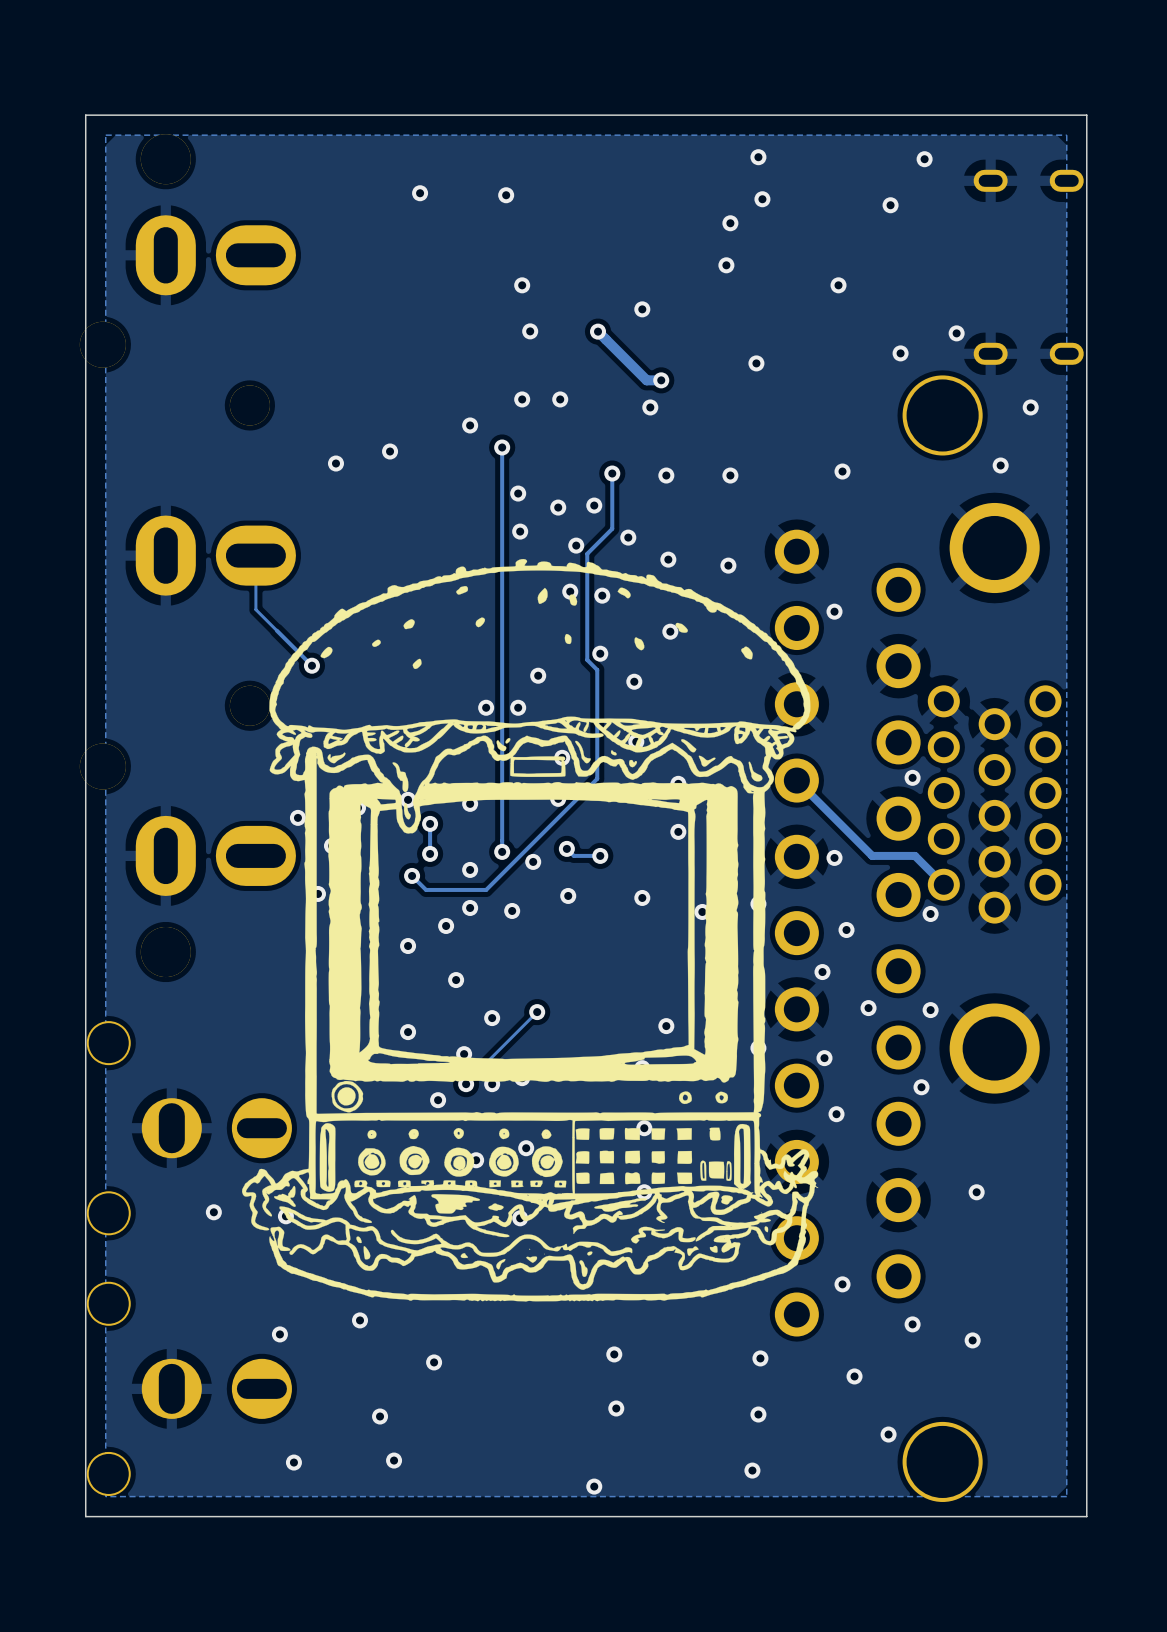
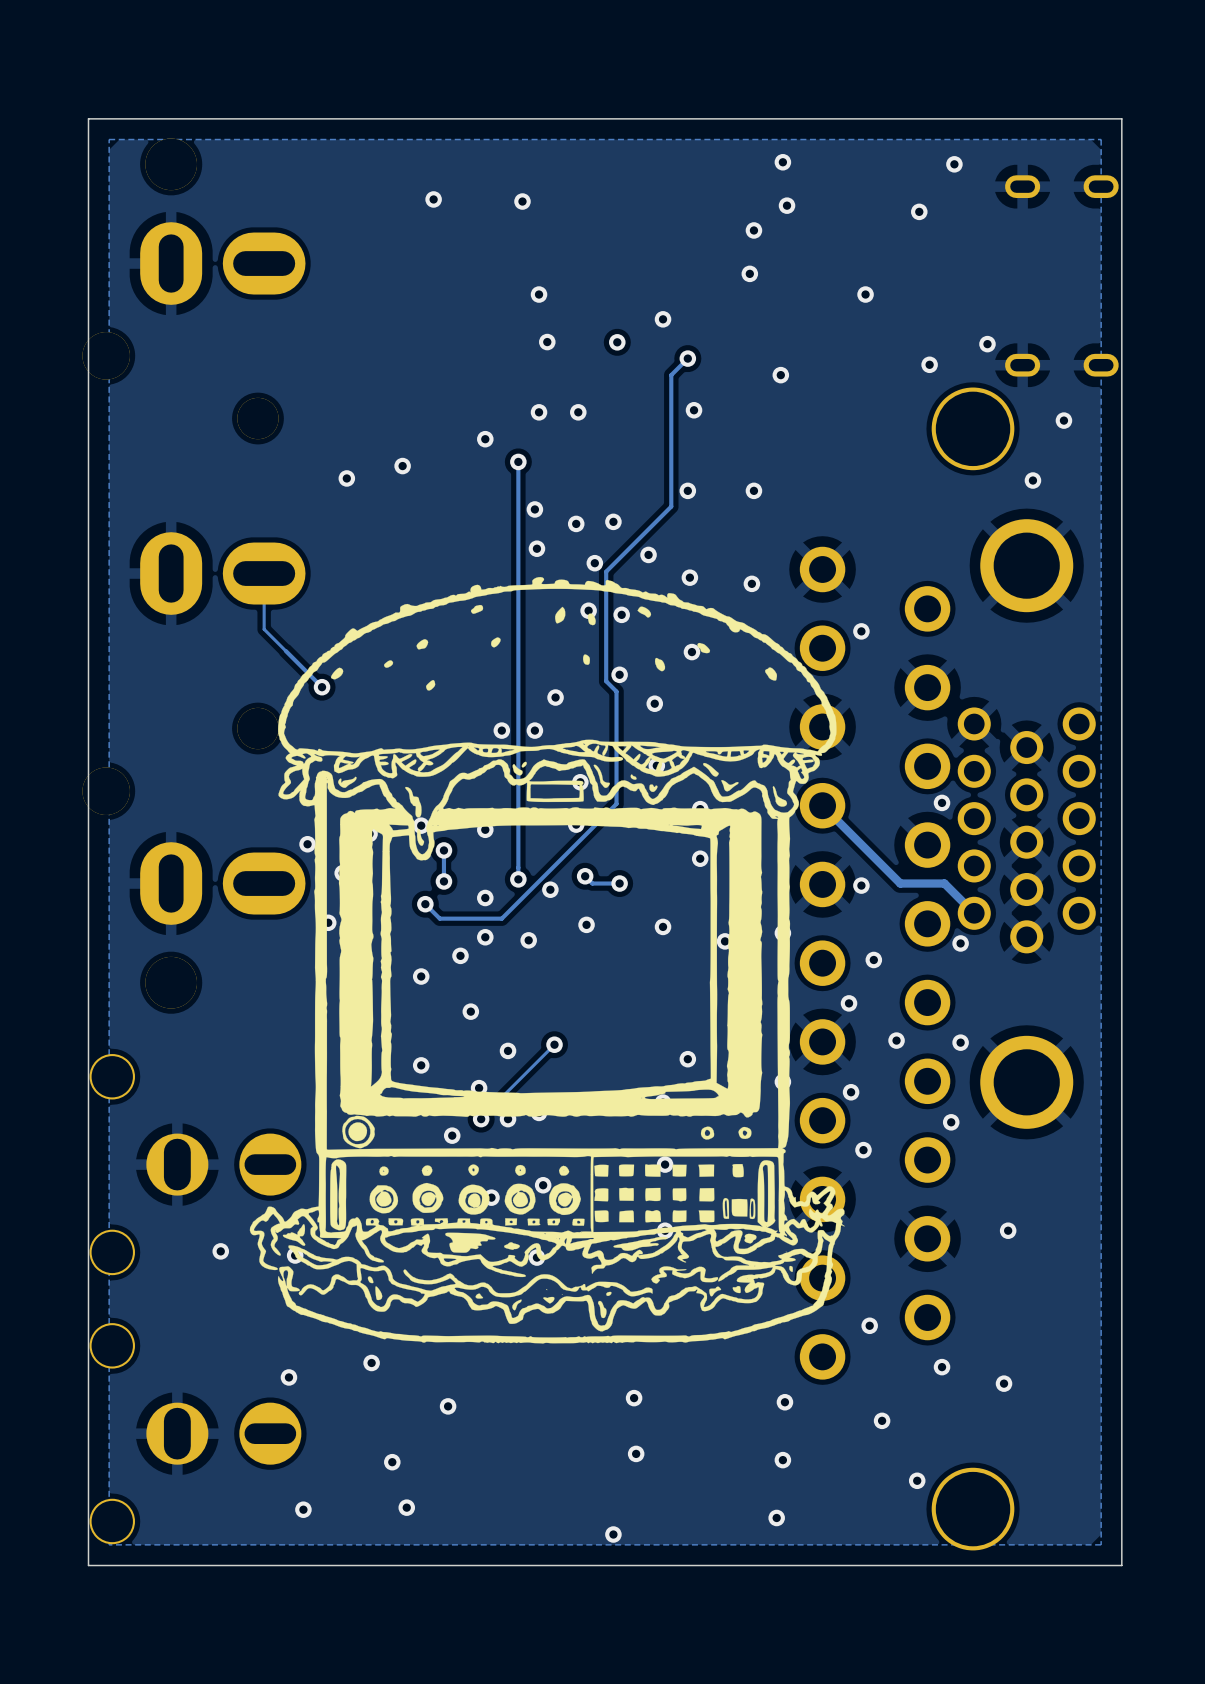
track: (598, 331) (646, 380) (661, 380) -> none
via: none -> (687, 358)
via: (661, 380) -> none
via: none -> (694, 410)
via: (650, 407) -> none
via: (842, 471) -> none
track: (612, 473) (612, 528) -> (687, 358) (671, 375) (671, 506) (632, 545)
via: (612, 473) -> none

